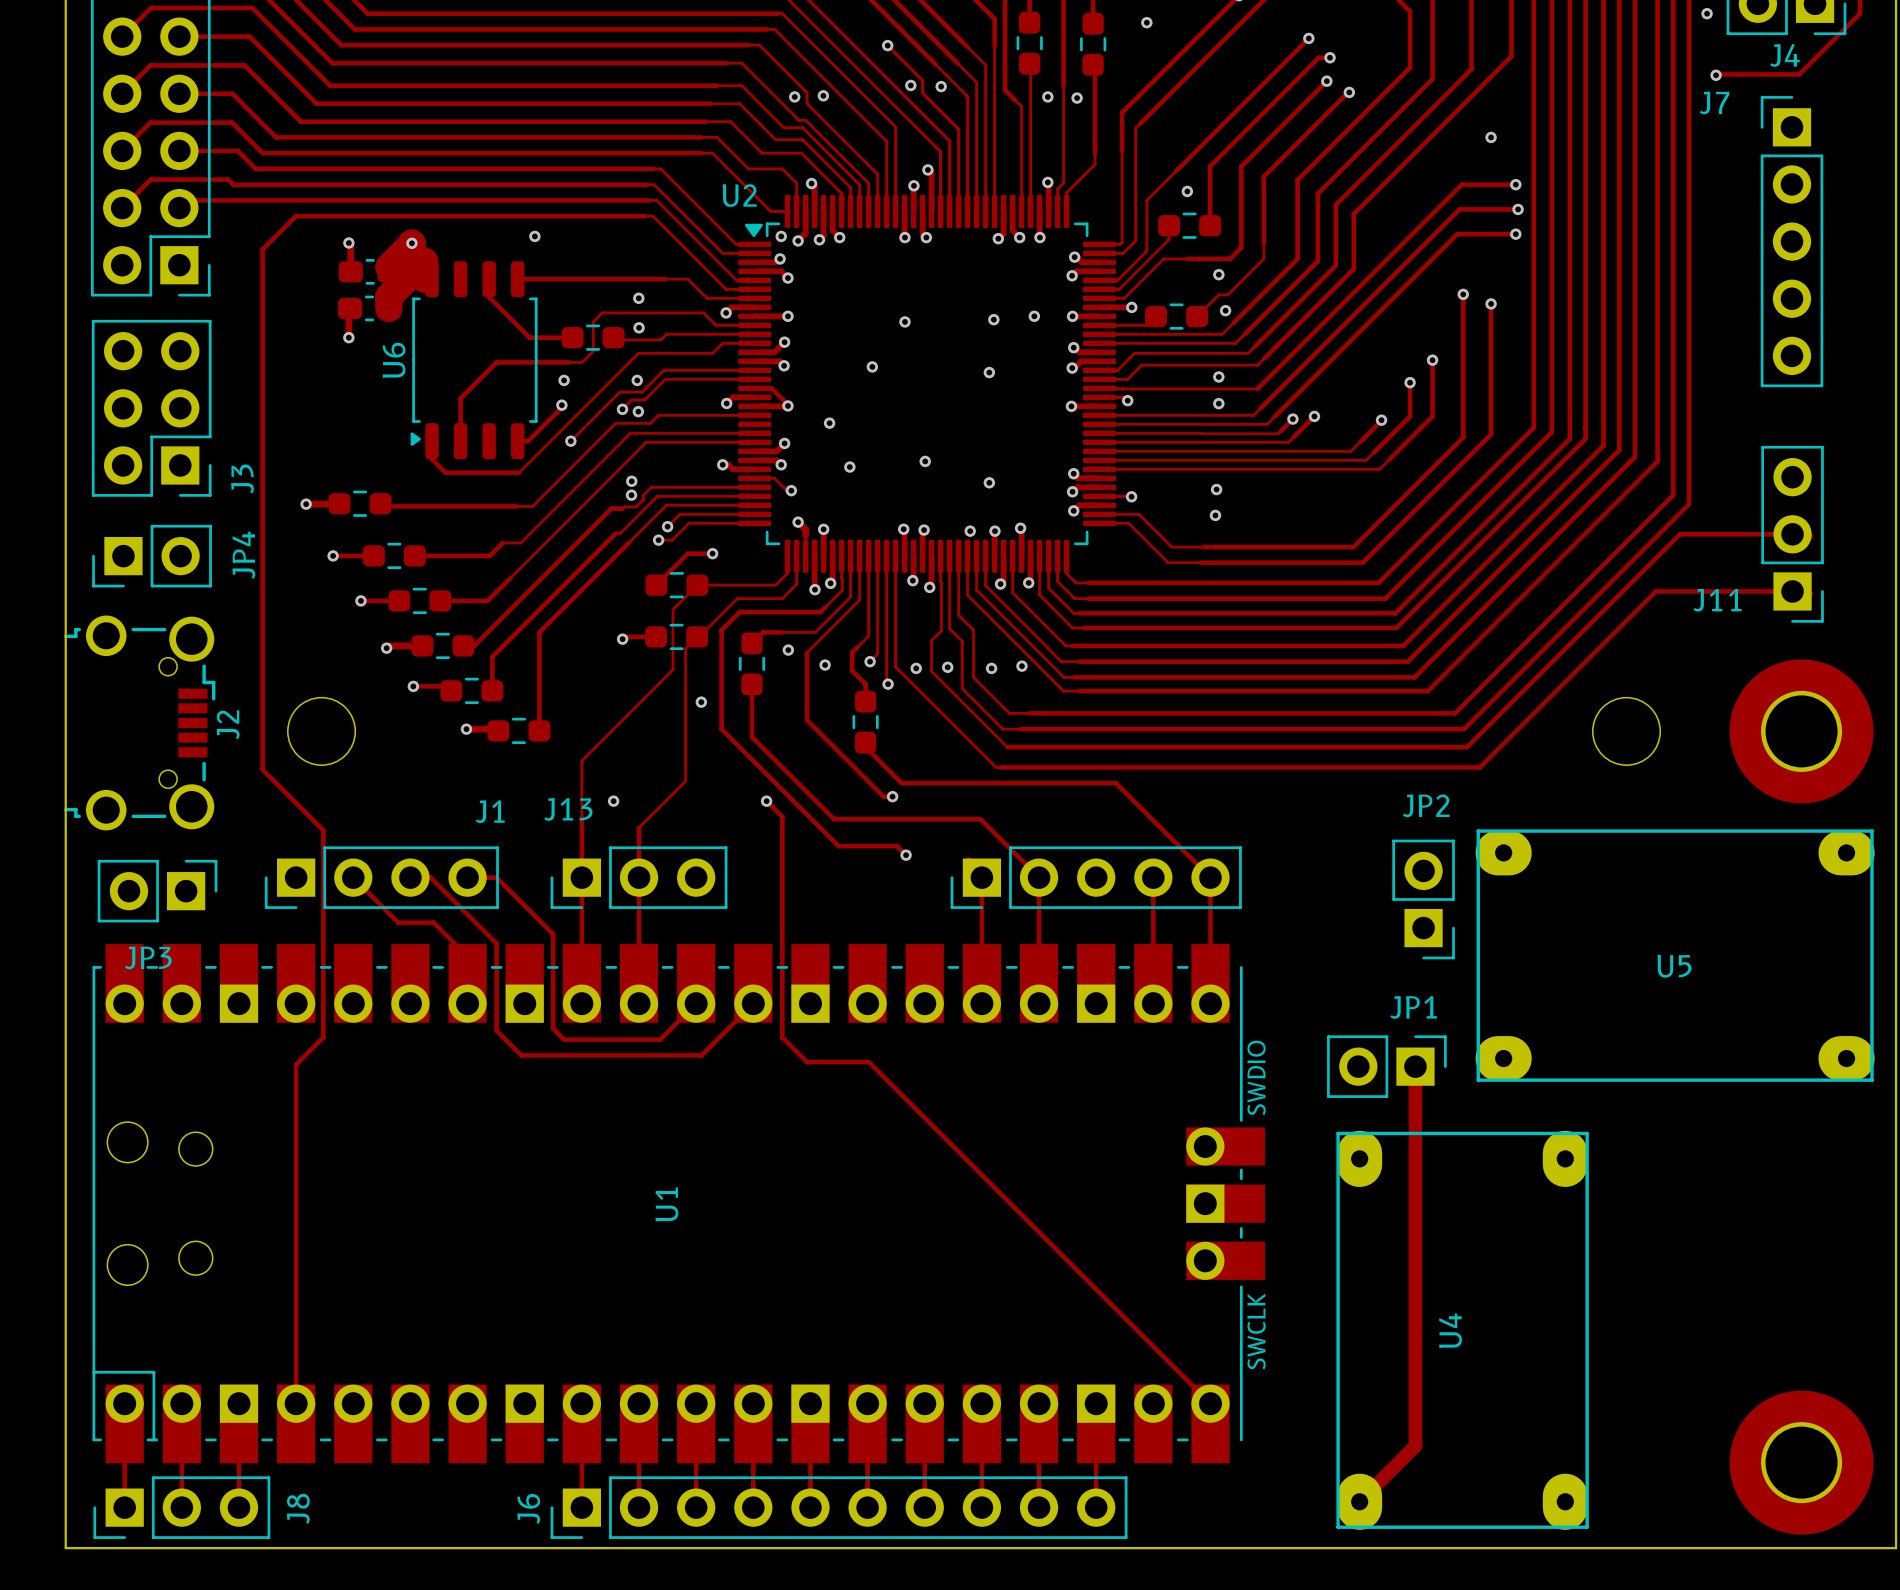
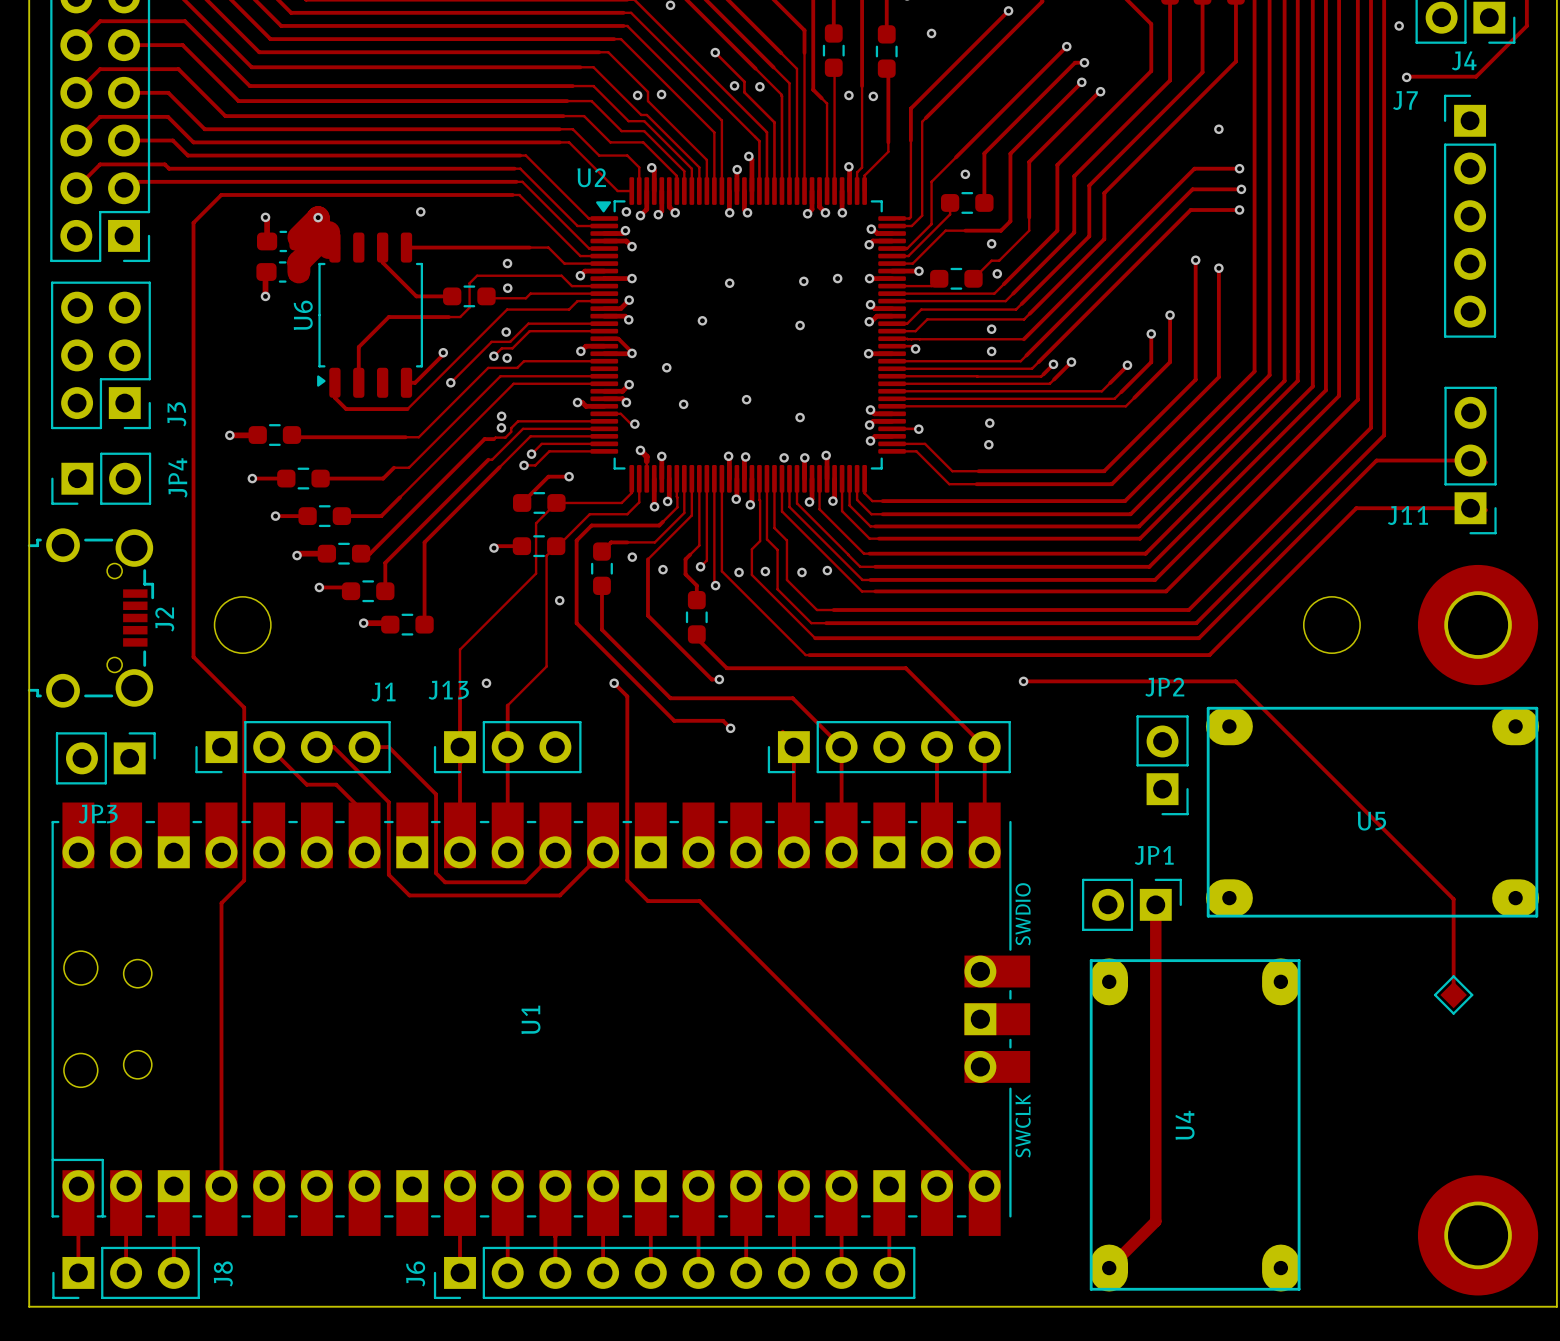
via: (564, 380) -> none
track: none -> (1023, 681) (1235, 681) (1453, 899) (1453, 995)
via: none -> (1023, 681)
part: none -> (1453, 995)

